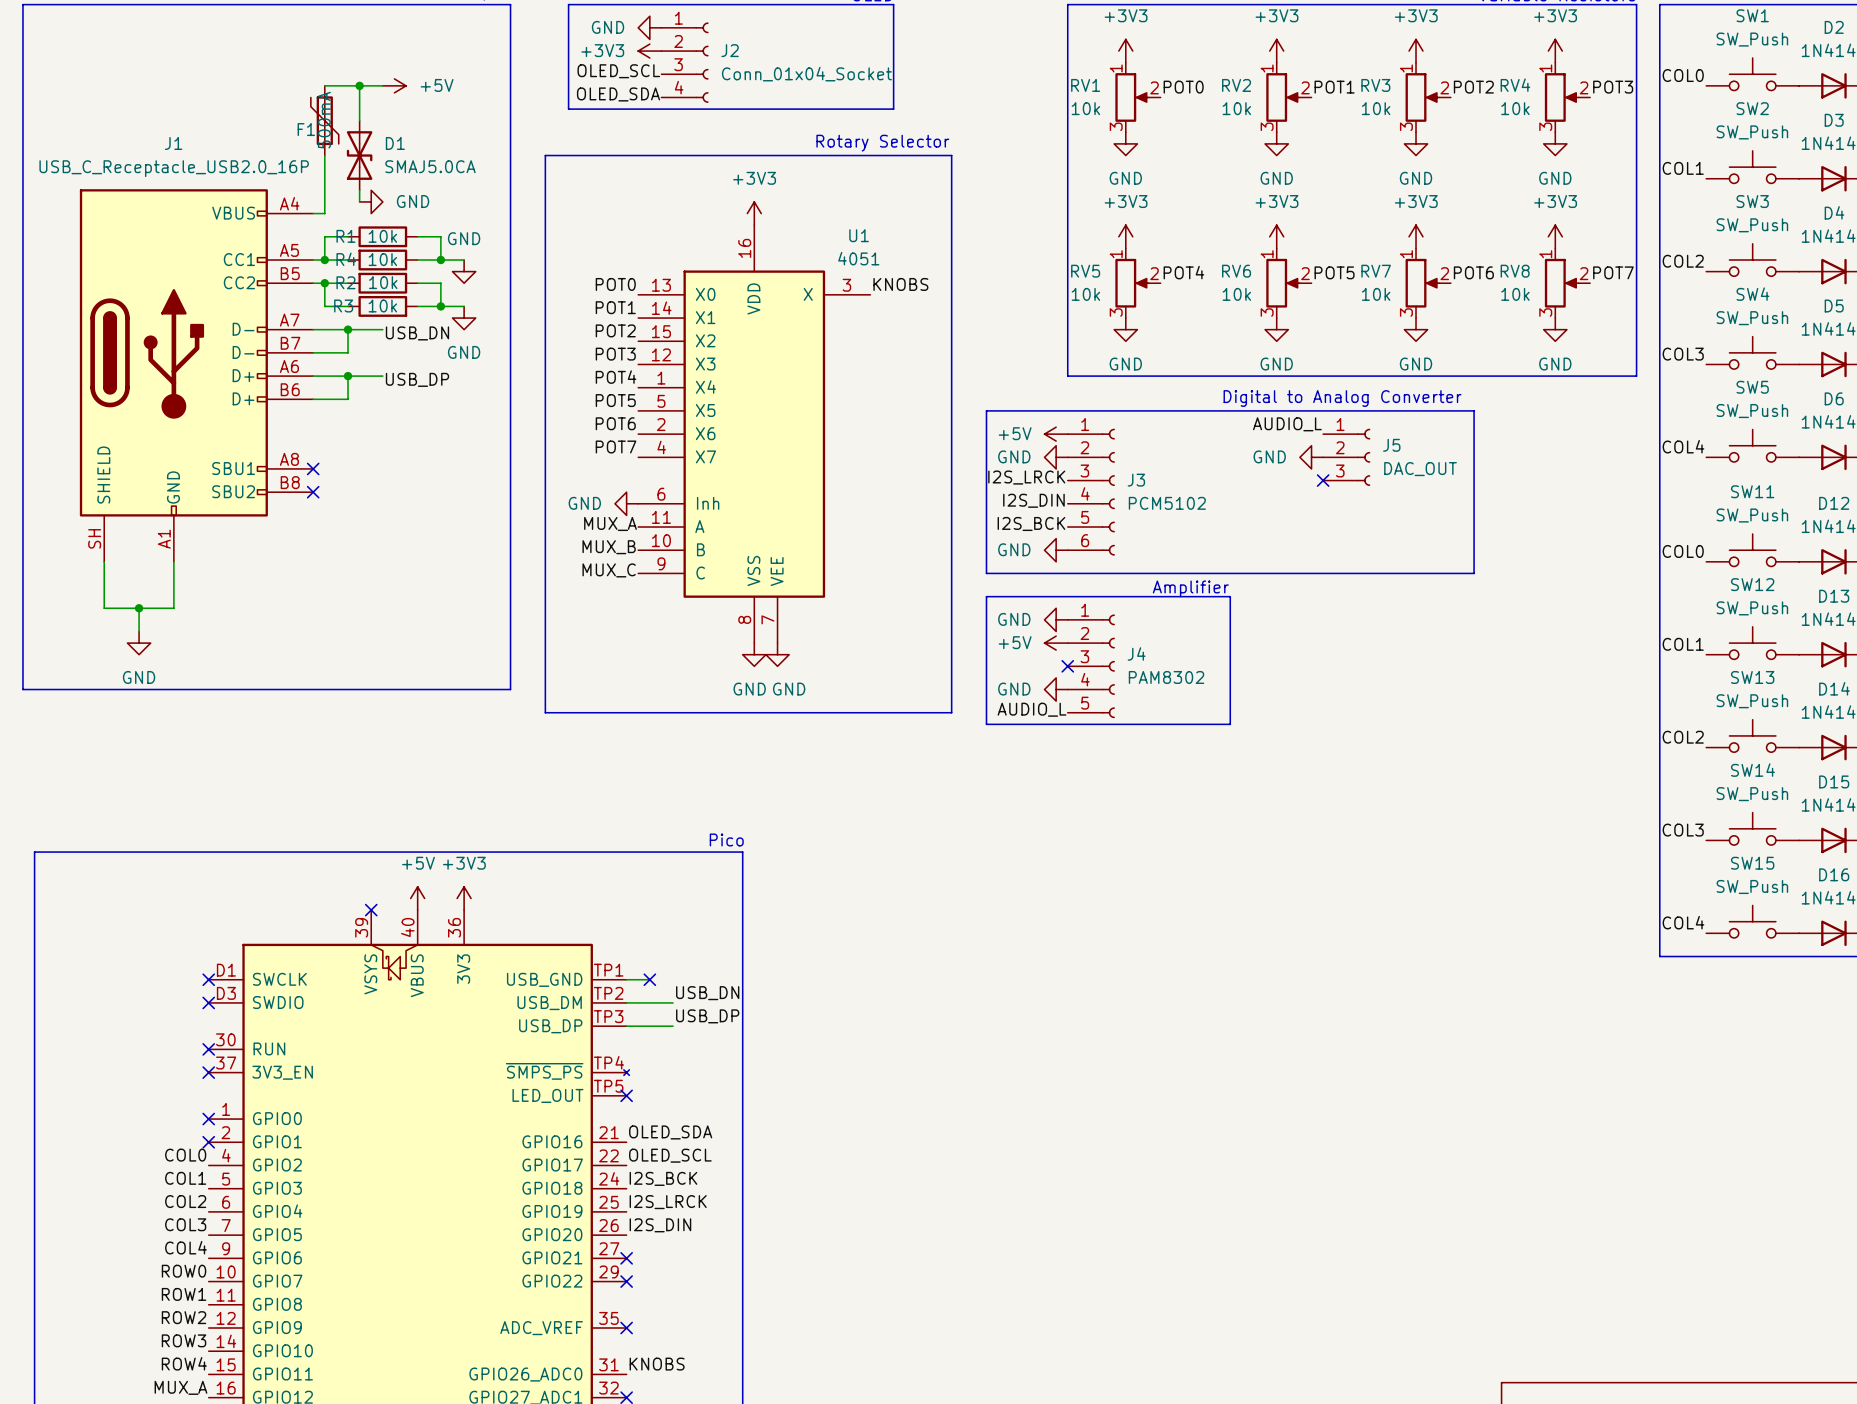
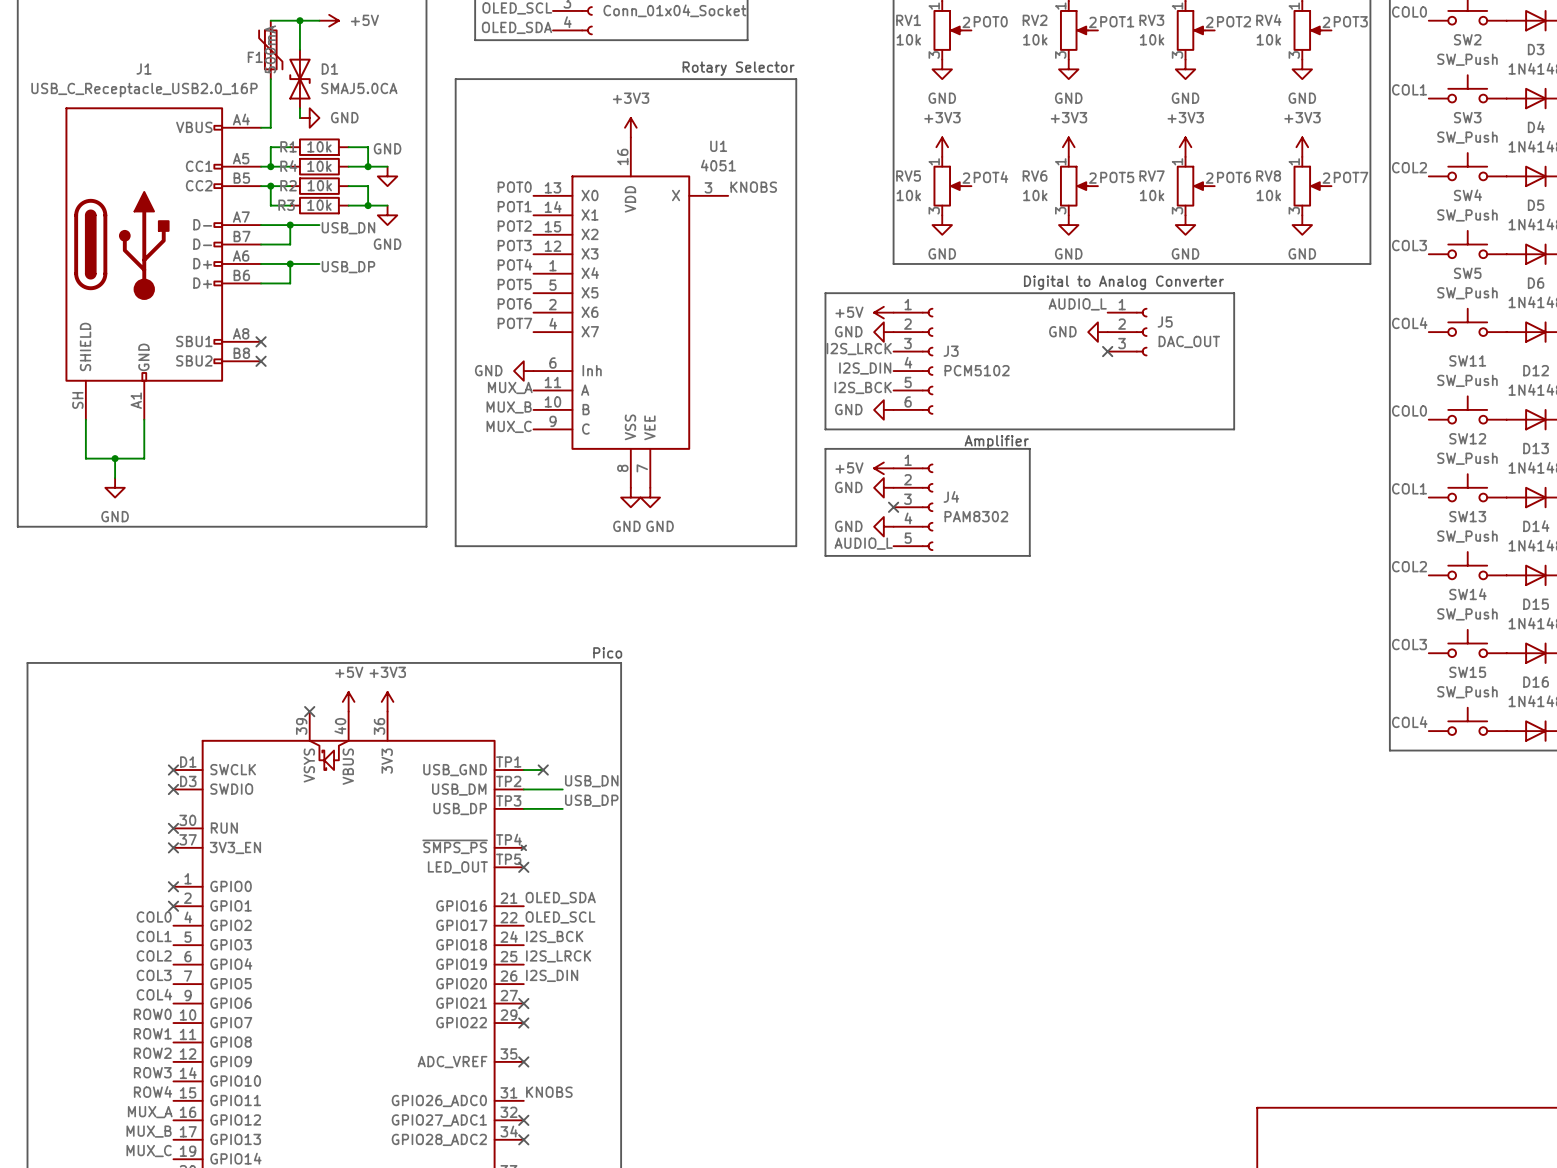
power symbol: GND (1056, 619) -> +5V (883, 468)
power symbol: +5V (1056, 643) -> GND (883, 487)

